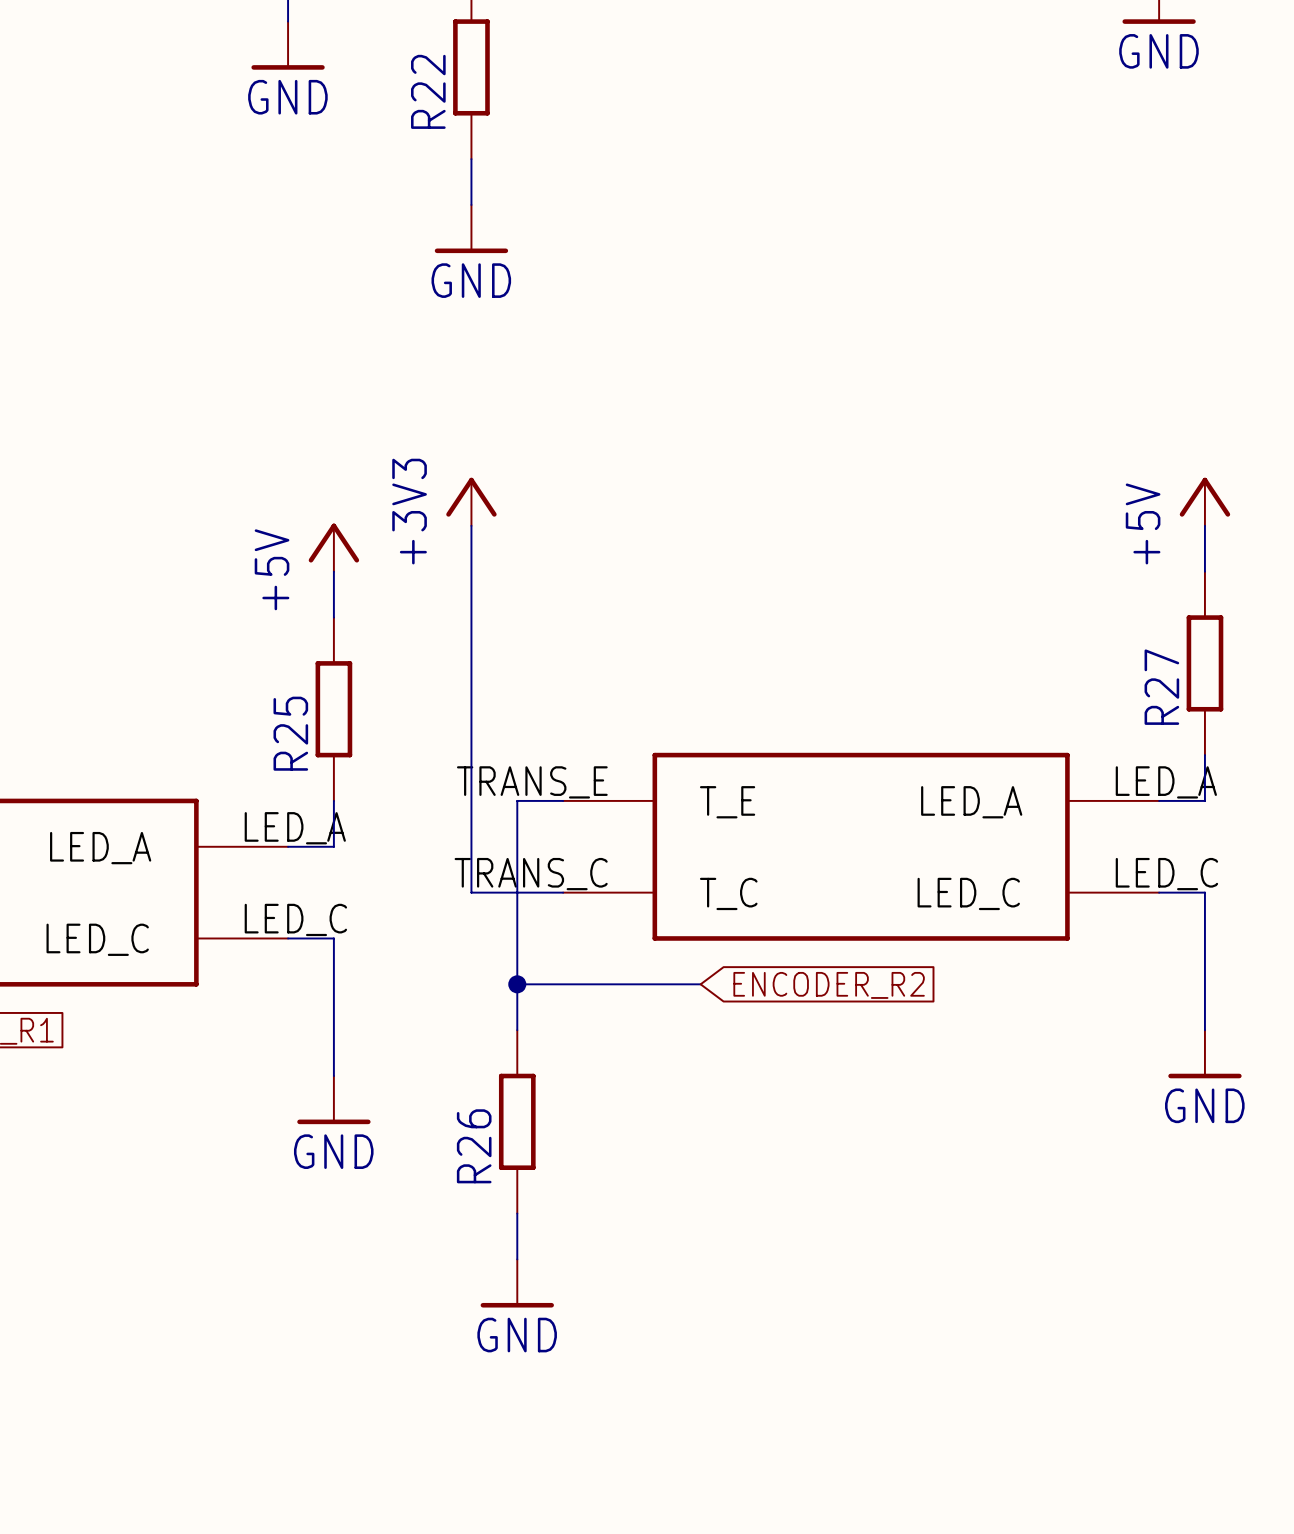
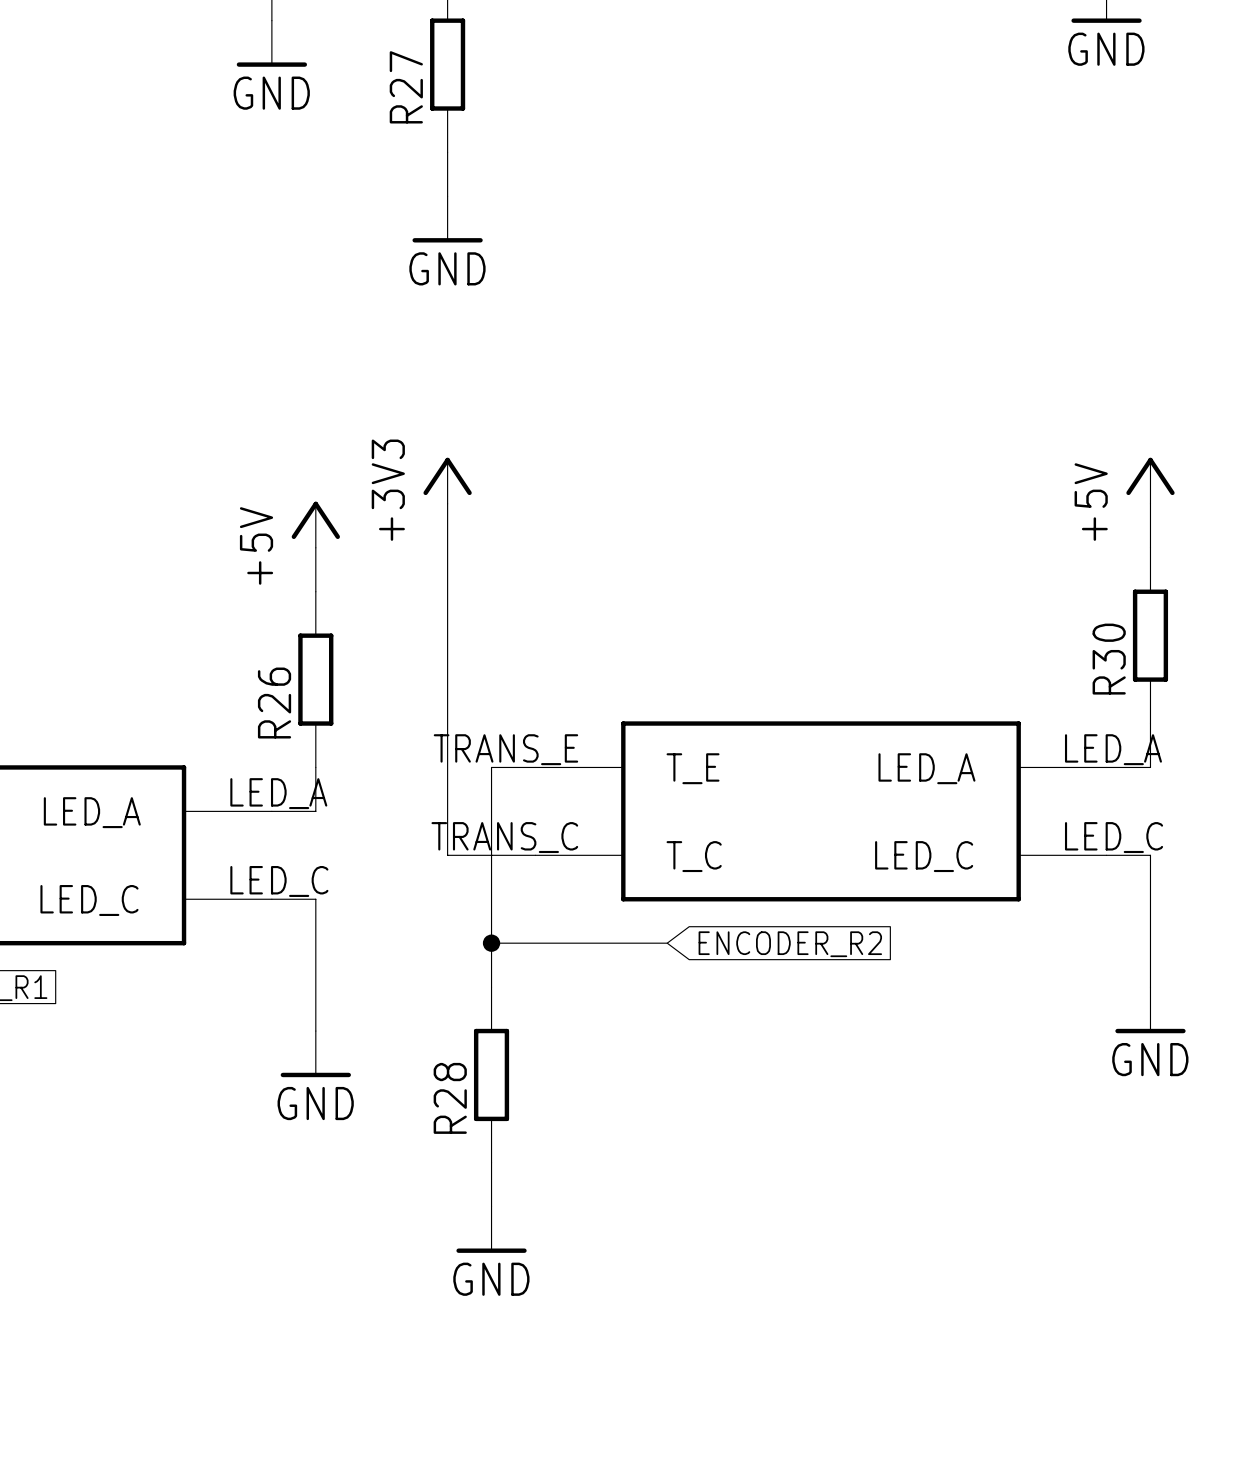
R22 name: R22 (428, 91) -> R27 (406, 87)
R27 name: R27 (1161, 687) -> R30 (1109, 659)
R25 name: R25 (290, 733) -> R26 (274, 703)
R26 name: R26 (474, 1146) -> R28 (450, 1098)

